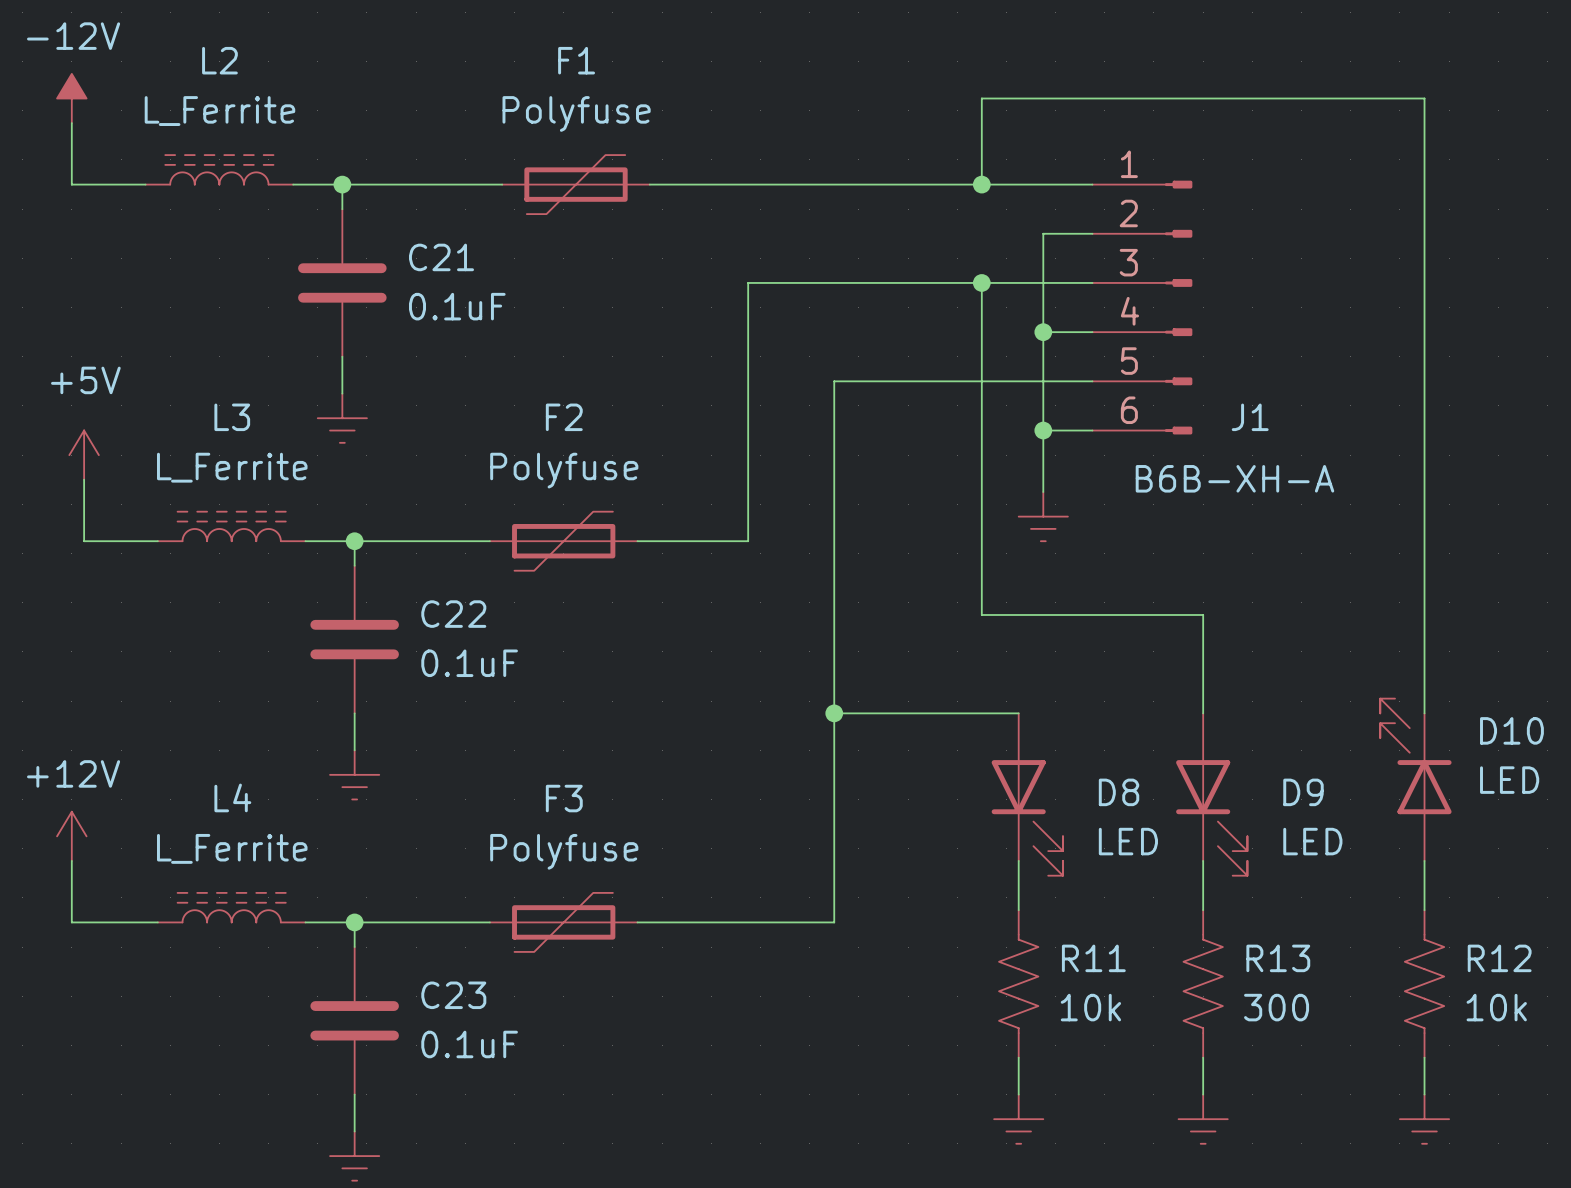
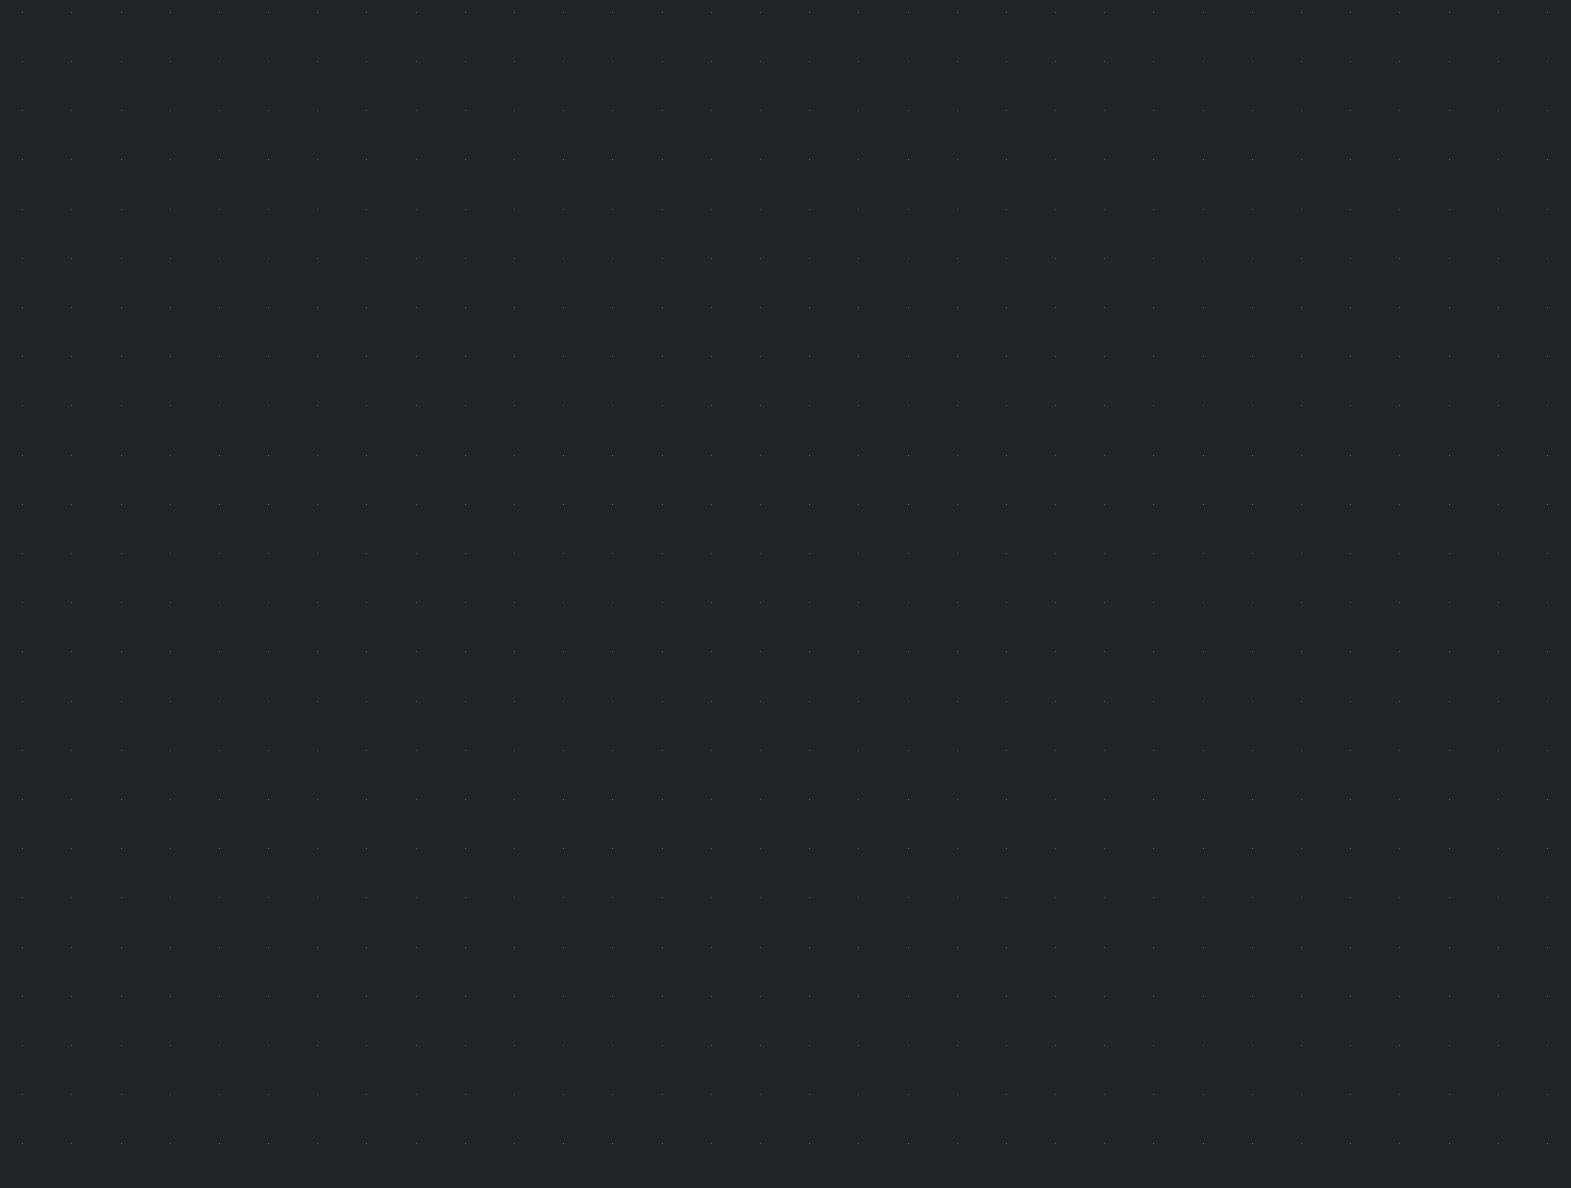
power symbol: -12V (71, 98) -> none
wire: (71, 123) (71, 184) (145, 184) -> none
L2: L_Ferrite (219, 169) -> none
wire: (293, 184) (502, 184) -> none
wire: (342, 184) (342, 209) -> none
junction: (342, 184) -> none
F1: Polyfuse (576, 184) -> none
wire: (649, 184) (1092, 184) -> none
wire: (981, 184) (981, 98) (1424, 98) (1424, 713) -> none
junction: (981, 184) -> none
wire: (1092, 233) (1043, 233) (1043, 492) -> none
C21: 0.1uF (342, 282) -> none
wire: (981, 282) (981, 614) (1203, 614) (1203, 713) -> none
junction: (981, 282) -> none
wire: (1092, 282) (748, 282) (748, 541) (637, 541) -> none
J1: B6B-XH-A (1142, 307) -> none
wire: (1043, 332) (1092, 332) -> none
junction: (1043, 332) -> none
wire: (342, 356) (342, 393) -> none
wire: (1092, 381) (834, 381) (834, 922) (637, 922) -> none
power symbol: (342, 418) -> none
wire: (1043, 430) (1092, 430) -> none
junction: (1043, 430) -> none
power symbol: +5V (84, 455) -> none
wire: (84, 479) (84, 541) (157, 541) -> none
power symbol: (1043, 516) -> none
L3: L_Ferrite (231, 526) -> none
wire: (305, 541) (489, 541) -> none
wire: (354, 541) (354, 565) -> none
junction: (354, 541) -> none
F2: Polyfuse (563, 541) -> none
C22: 0.1uF (354, 639) -> none
wire: (354, 713) (354, 750) -> none
wire: (834, 713) (1018, 713) -> none
junction: (834, 713) -> none
power symbol: (354, 774) -> none
D10: LED (1415, 779) -> none
D8: LED (1027, 794) -> none
D9: LED (1211, 794) -> none
power symbol: +12V (71, 836) -> none
wire: (71, 860) (71, 922) (157, 922) -> none
wire: (1018, 860) (1018, 910) -> none
wire: (1203, 860) (1203, 910) -> none
wire: (1424, 860) (1424, 910) -> none
L4: L_Ferrite (231, 907) -> none
wire: (305, 922) (489, 922) -> none
wire: (354, 922) (354, 947) -> none
junction: (354, 922) -> none
F3: Polyfuse (563, 922) -> none
R11: 10k (1018, 983) -> none
R13: 300 (1203, 983) -> none
R12: 10k (1424, 983) -> none
C23: 0.1uF (354, 1020) -> none
wire: (1018, 1057) (1018, 1094) -> none
wire: (1203, 1057) (1203, 1094) -> none
wire: (1424, 1057) (1424, 1094) -> none
wire: (354, 1094) (354, 1131) -> none
power symbol: (1018, 1119) -> none
power symbol: (1203, 1119) -> none
power symbol: (1424, 1119) -> none
power symbol: (354, 1156) -> none

